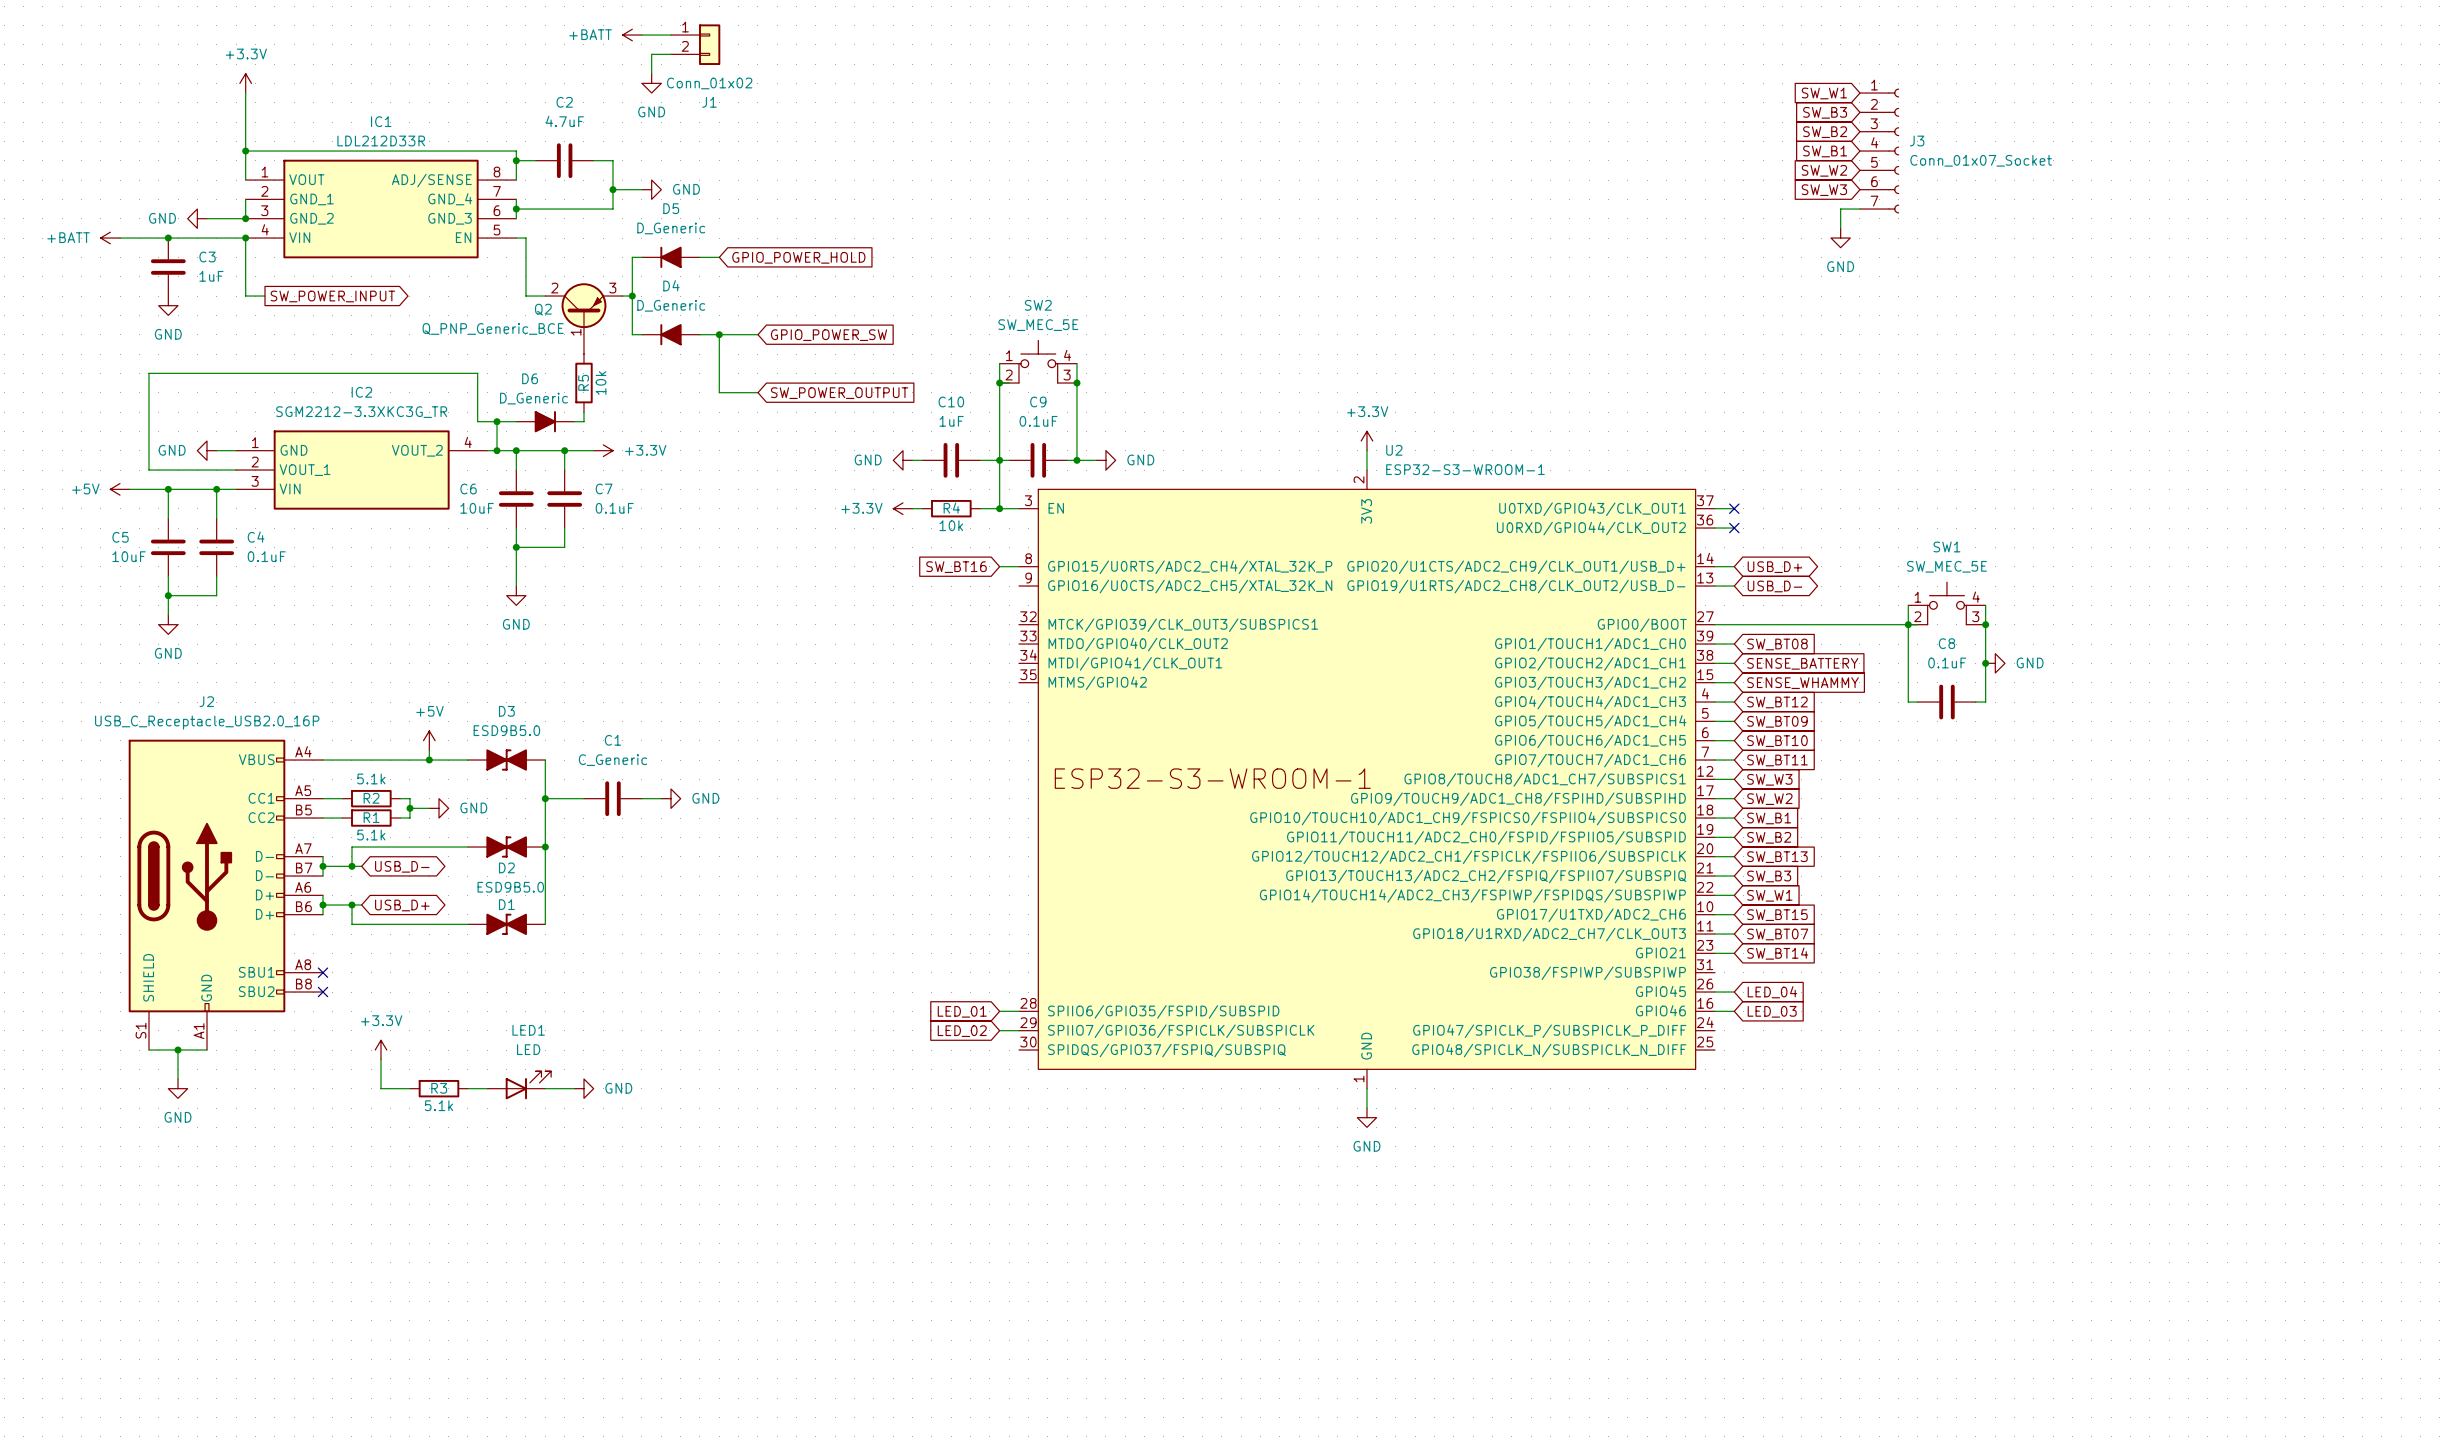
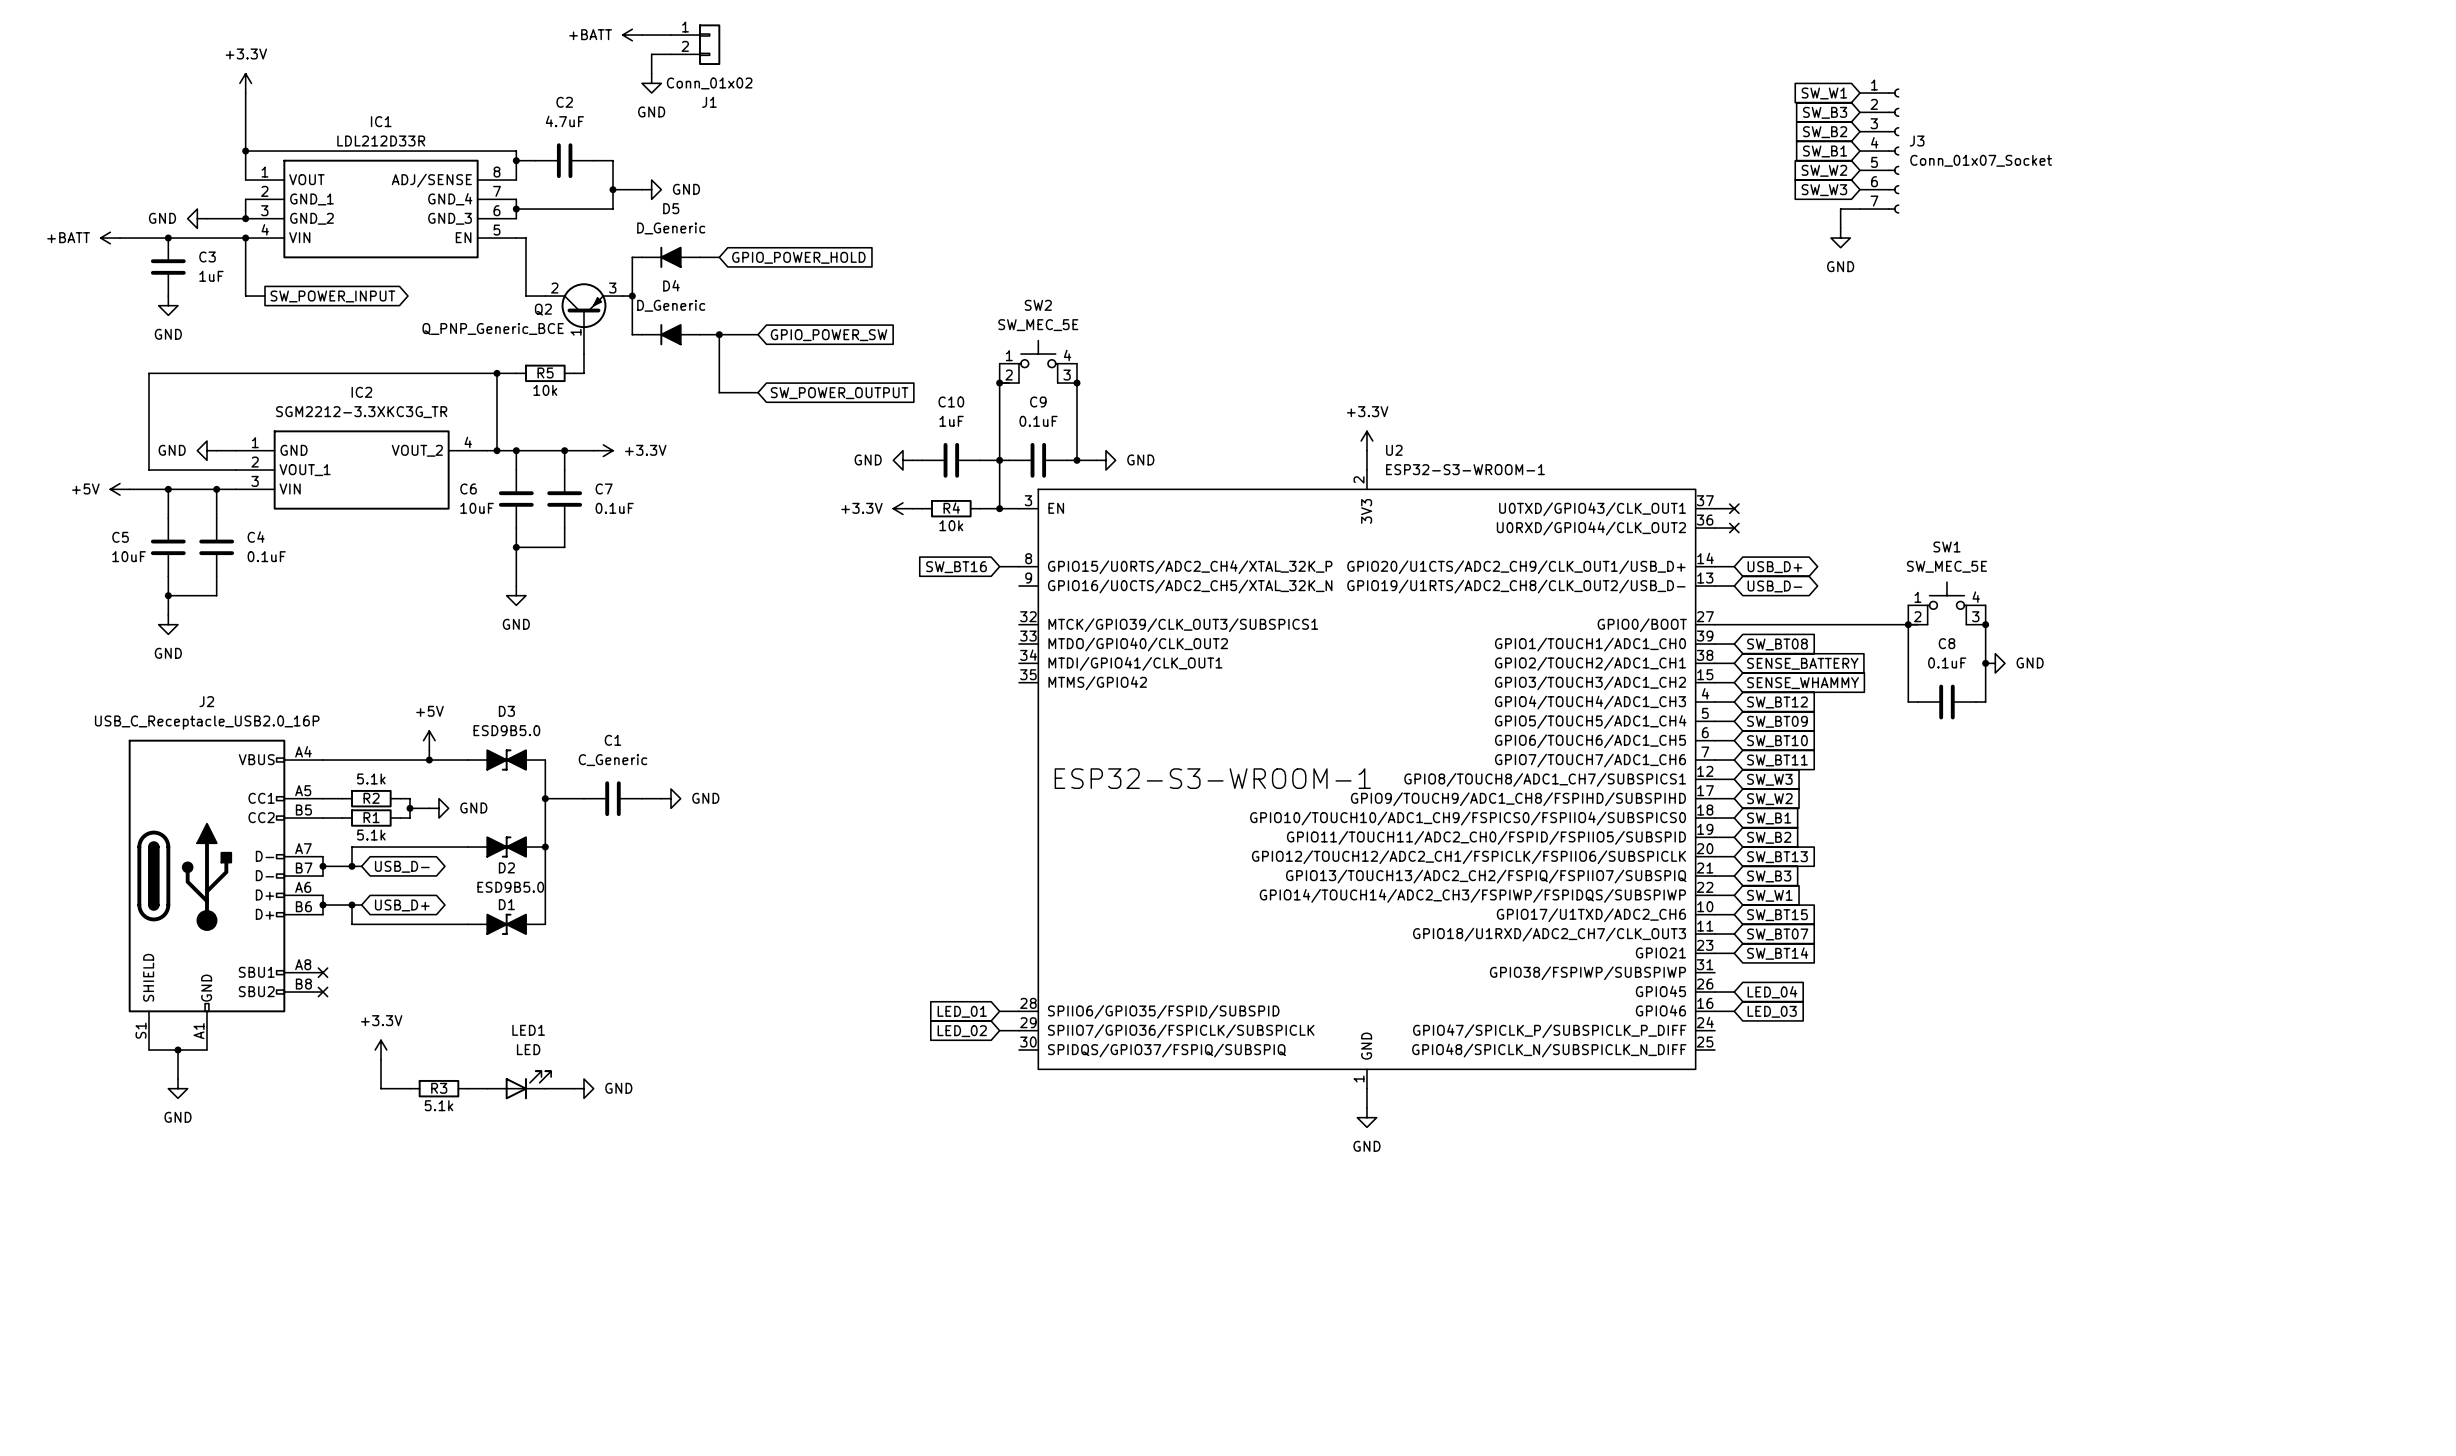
wire: none -> (583, 354) (583, 373) (574, 373)
wire: (477, 373) (477, 421) (516, 421) -> (477, 373) (516, 373)
wire: none -> (496, 373) (496, 421)
junction: none -> (496, 373)
R5 rotation: 0° (583, 383) -> 90° clockwise (545, 373)
R5 position: (583, 383) -> (545, 373)
wire: (583, 412) (583, 421) (574, 421) -> none
junction: (496, 421) -> none
D6: D_Generic (545, 421) -> none

